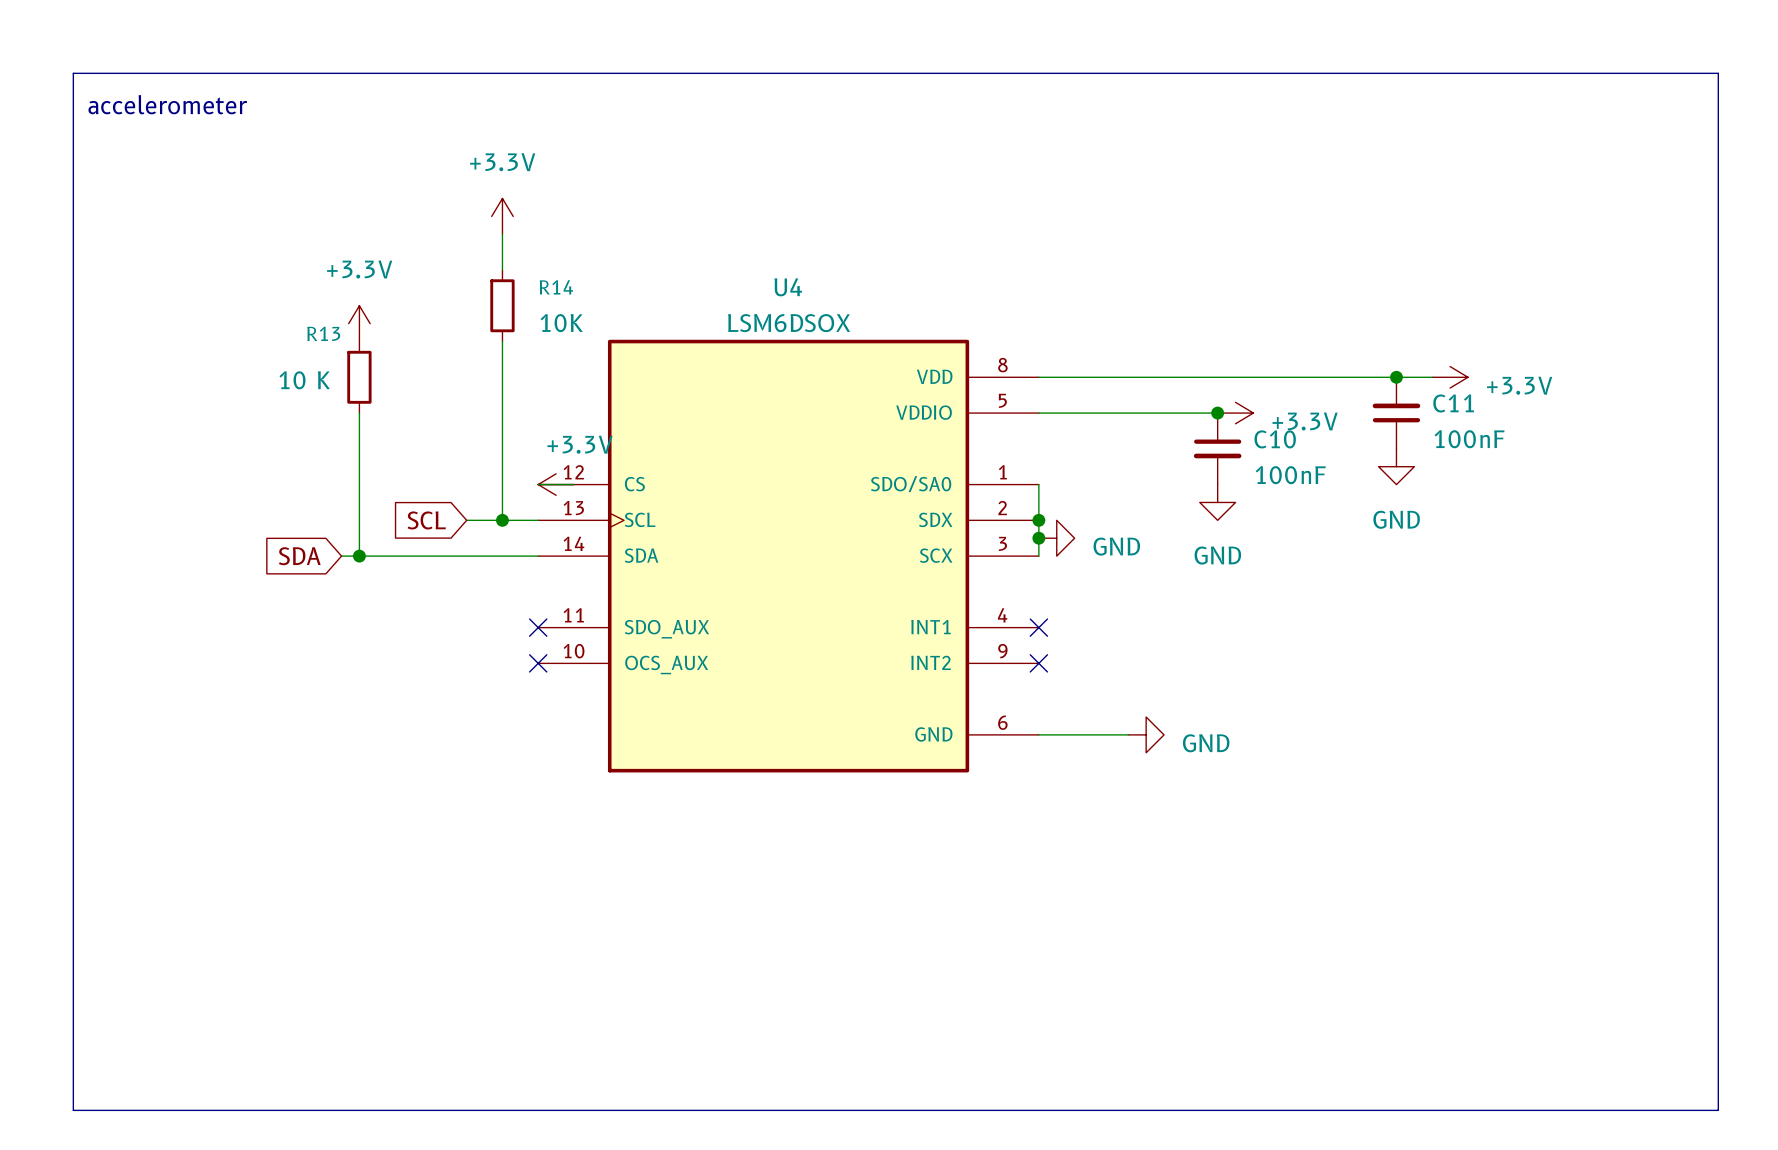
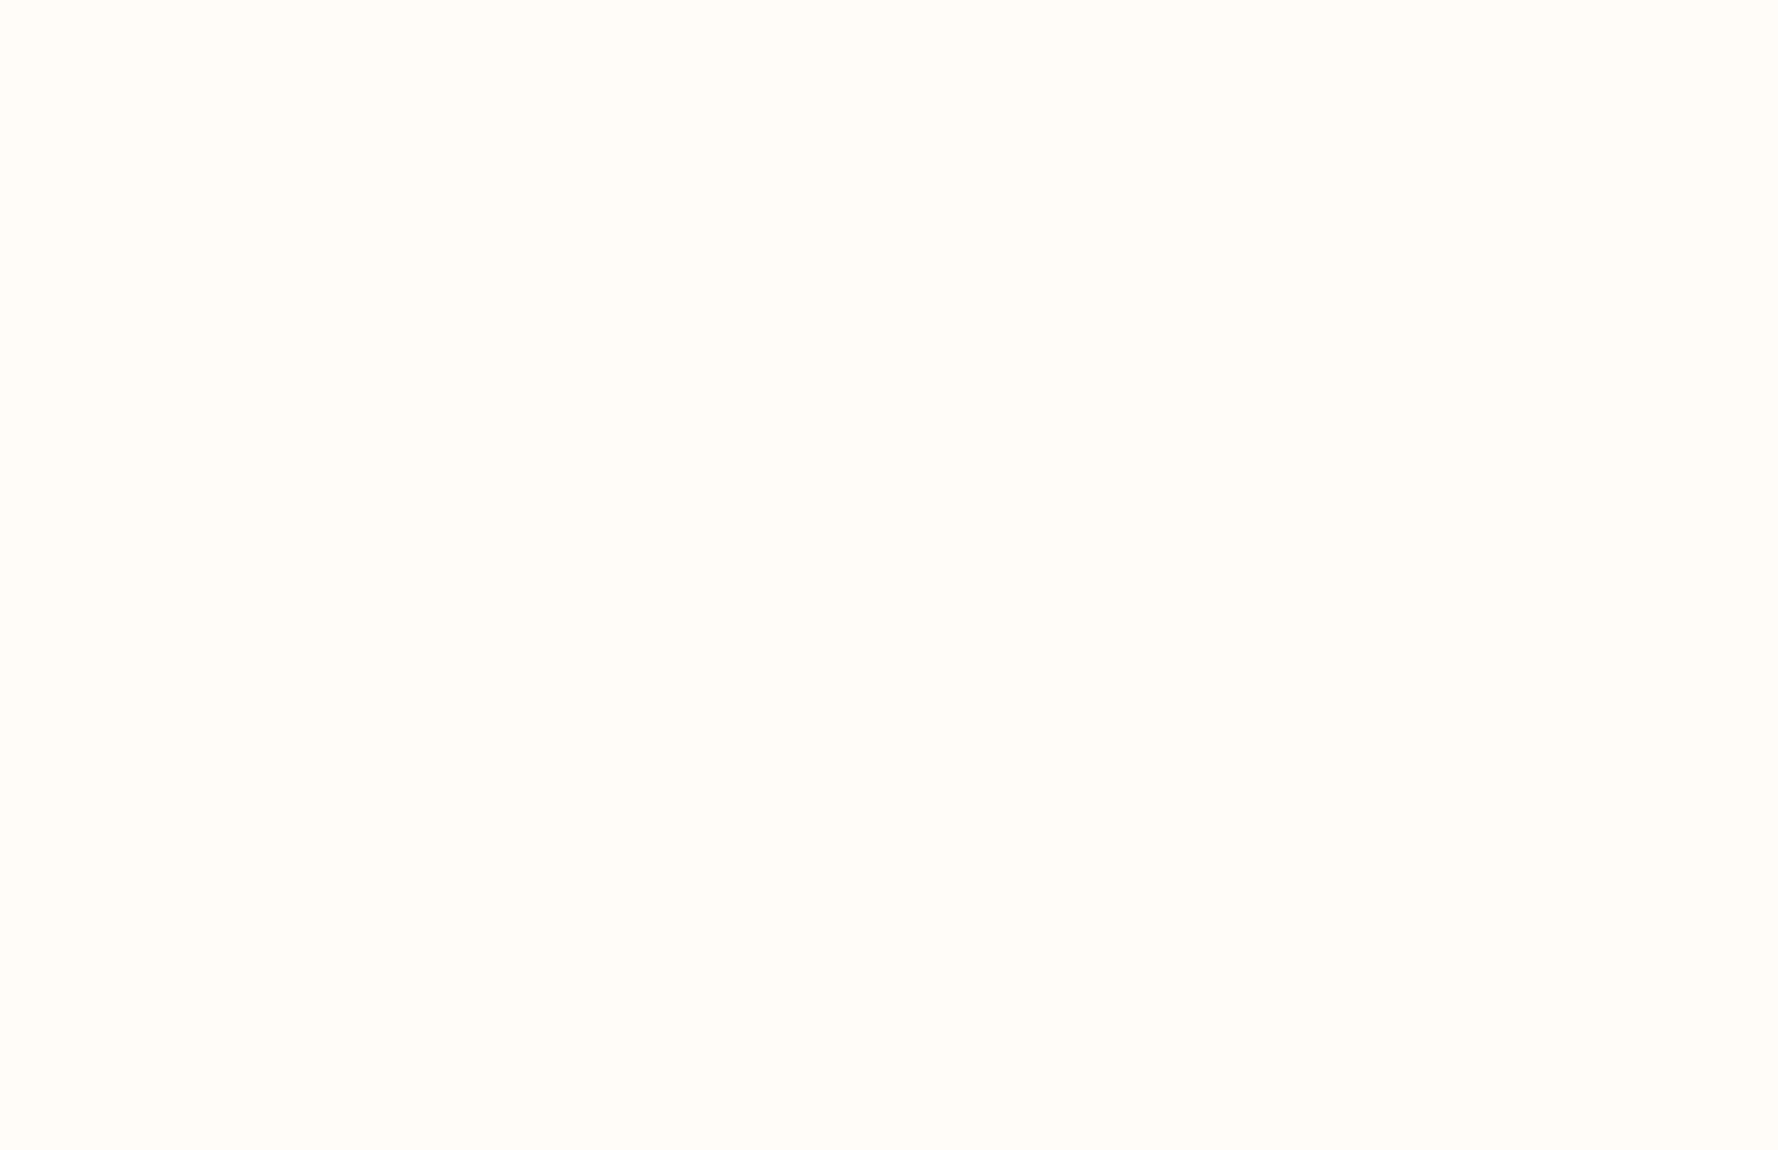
line: (73, 73) (1718, 73) (1718, 1110) (73, 1110) (73, 73) -> none
text: accelerometer (167, 104) -> none
power symbol: +3.3V (502, 216) -> none
wire: (502, 234) (502, 270) -> none
R14: 10K (502, 305) -> none
power symbol: +3.3V (359, 323) -> none
wire: (502, 341) (502, 520) -> none
R13: 10 K (359, 377) -> none
wire: (1038, 377) (1432, 377) -> none
junction: (1396, 377) -> none
power symbol: +3.3V (1450, 377) -> none
wire: (359, 413) (359, 556) -> none
wire: (1038, 413) (1217, 413) -> none
junction: (1217, 413) -> none
power symbol: +3.3V (1235, 413) -> none
C11: 100nF (1396, 413) -> none
C10: 100nF (1217, 448) -> none
power symbol: GND (1396, 466) -> none
wire: (538, 484) (573, 484) -> none
power symbol: +3.3V (556, 484) -> none
wire: (1038, 484) (1038, 556) -> none
power symbol: GND (1217, 502) -> none
global label: SCL (426, 520) -> none
wire: (466, 520) (538, 520) -> none
junction: (502, 520) -> none
junction: (1038, 520) -> none
junction: (1038, 538) -> none
power symbol: GND (1056, 538) -> none
global label: SDA (299, 556) -> none
wire: (341, 556) (538, 556) -> none
junction: (359, 556) -> none
U4: LSM6DSOX (788, 556) -> none
no-connect mark: (538, 627) -> none
no-connect mark: (1038, 627) -> none
no-connect mark: (538, 663) -> none
no-connect mark: (1038, 663) -> none
wire: (1038, 734) (1128, 734) -> none
power symbol: GND (1146, 734) -> none

